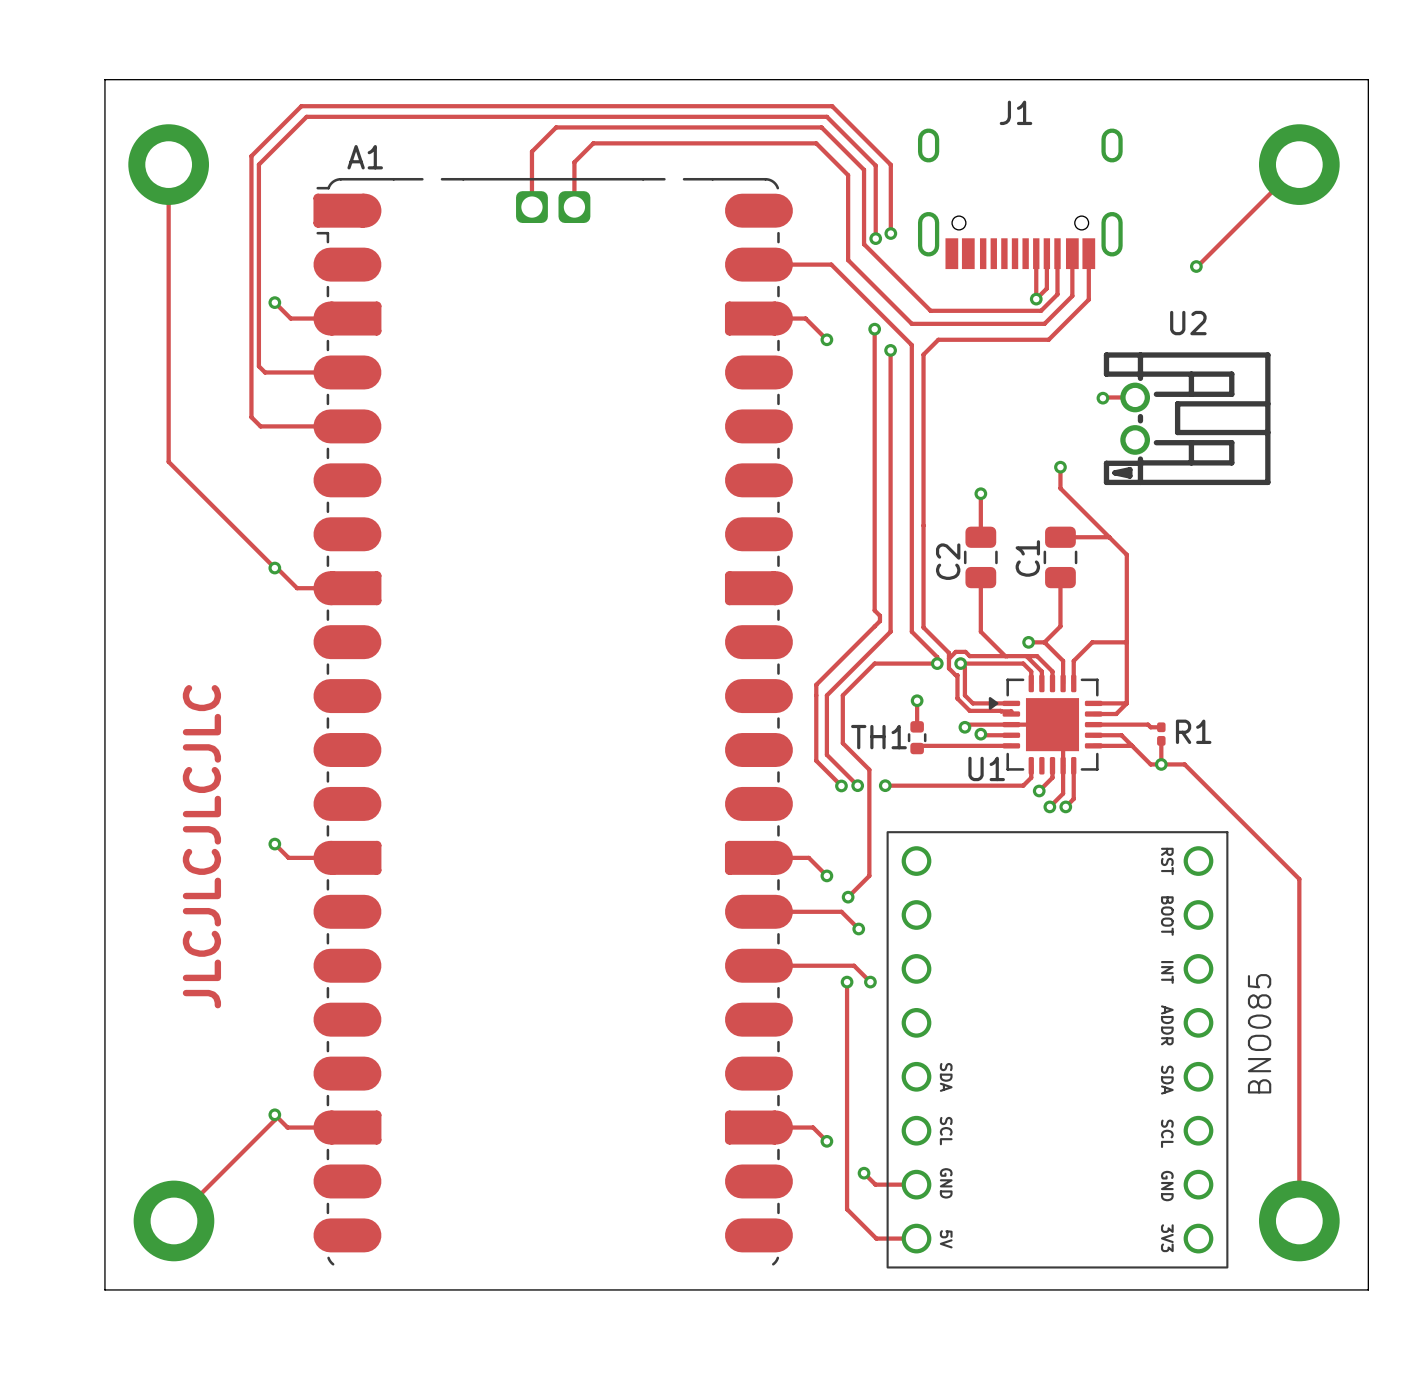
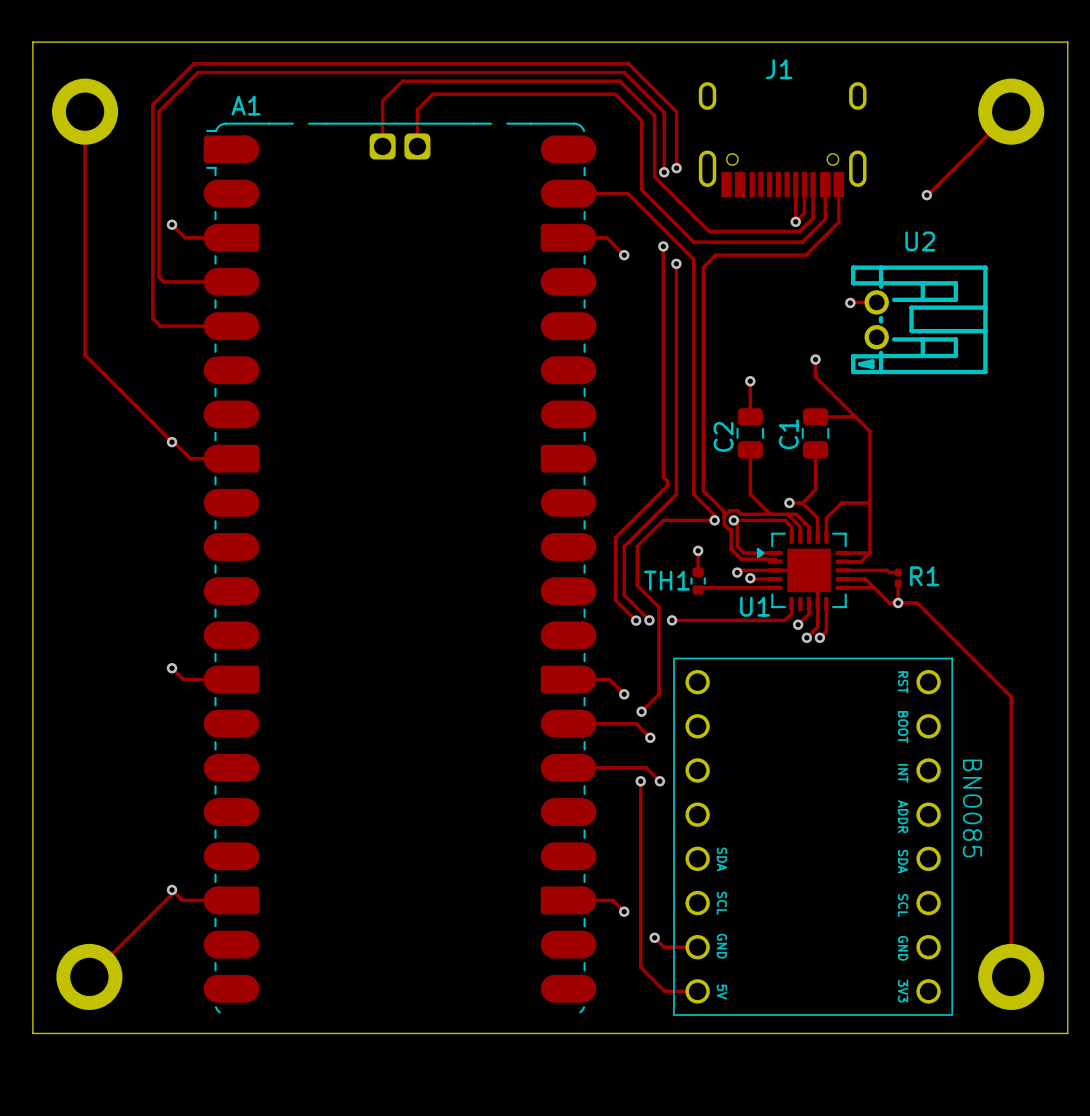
text: JLCJLCJLCJLC (201, 846) -> none
part text rotation: 0° (1259, 1033) -> 180° (972, 808)

